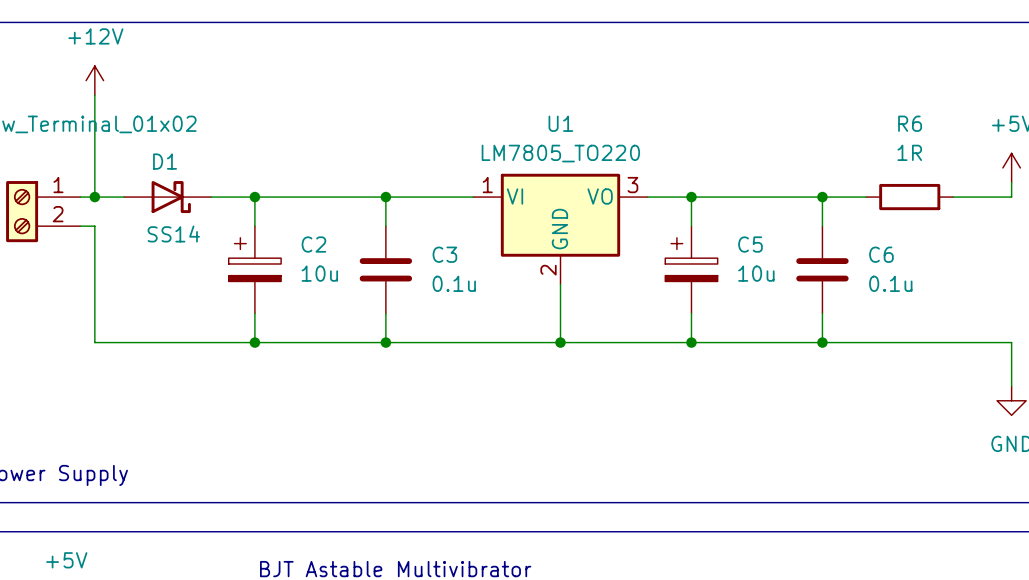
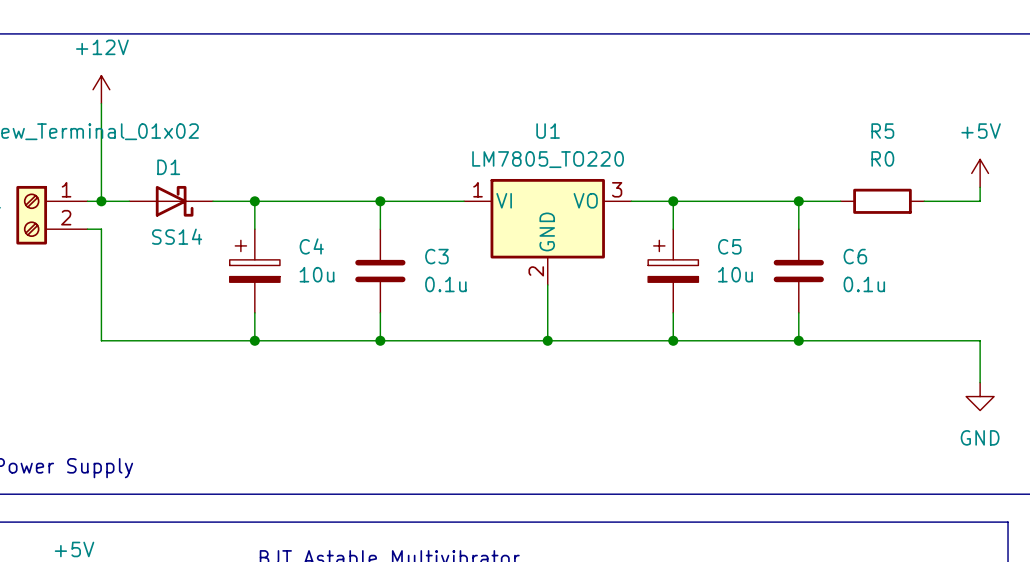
R6 name: R6 (910, 123) -> R5 (882, 131)
R6 value: 1R (909, 152) -> R0 (882, 158)
C2 name: C2 (313, 244) -> C4 (311, 246)

